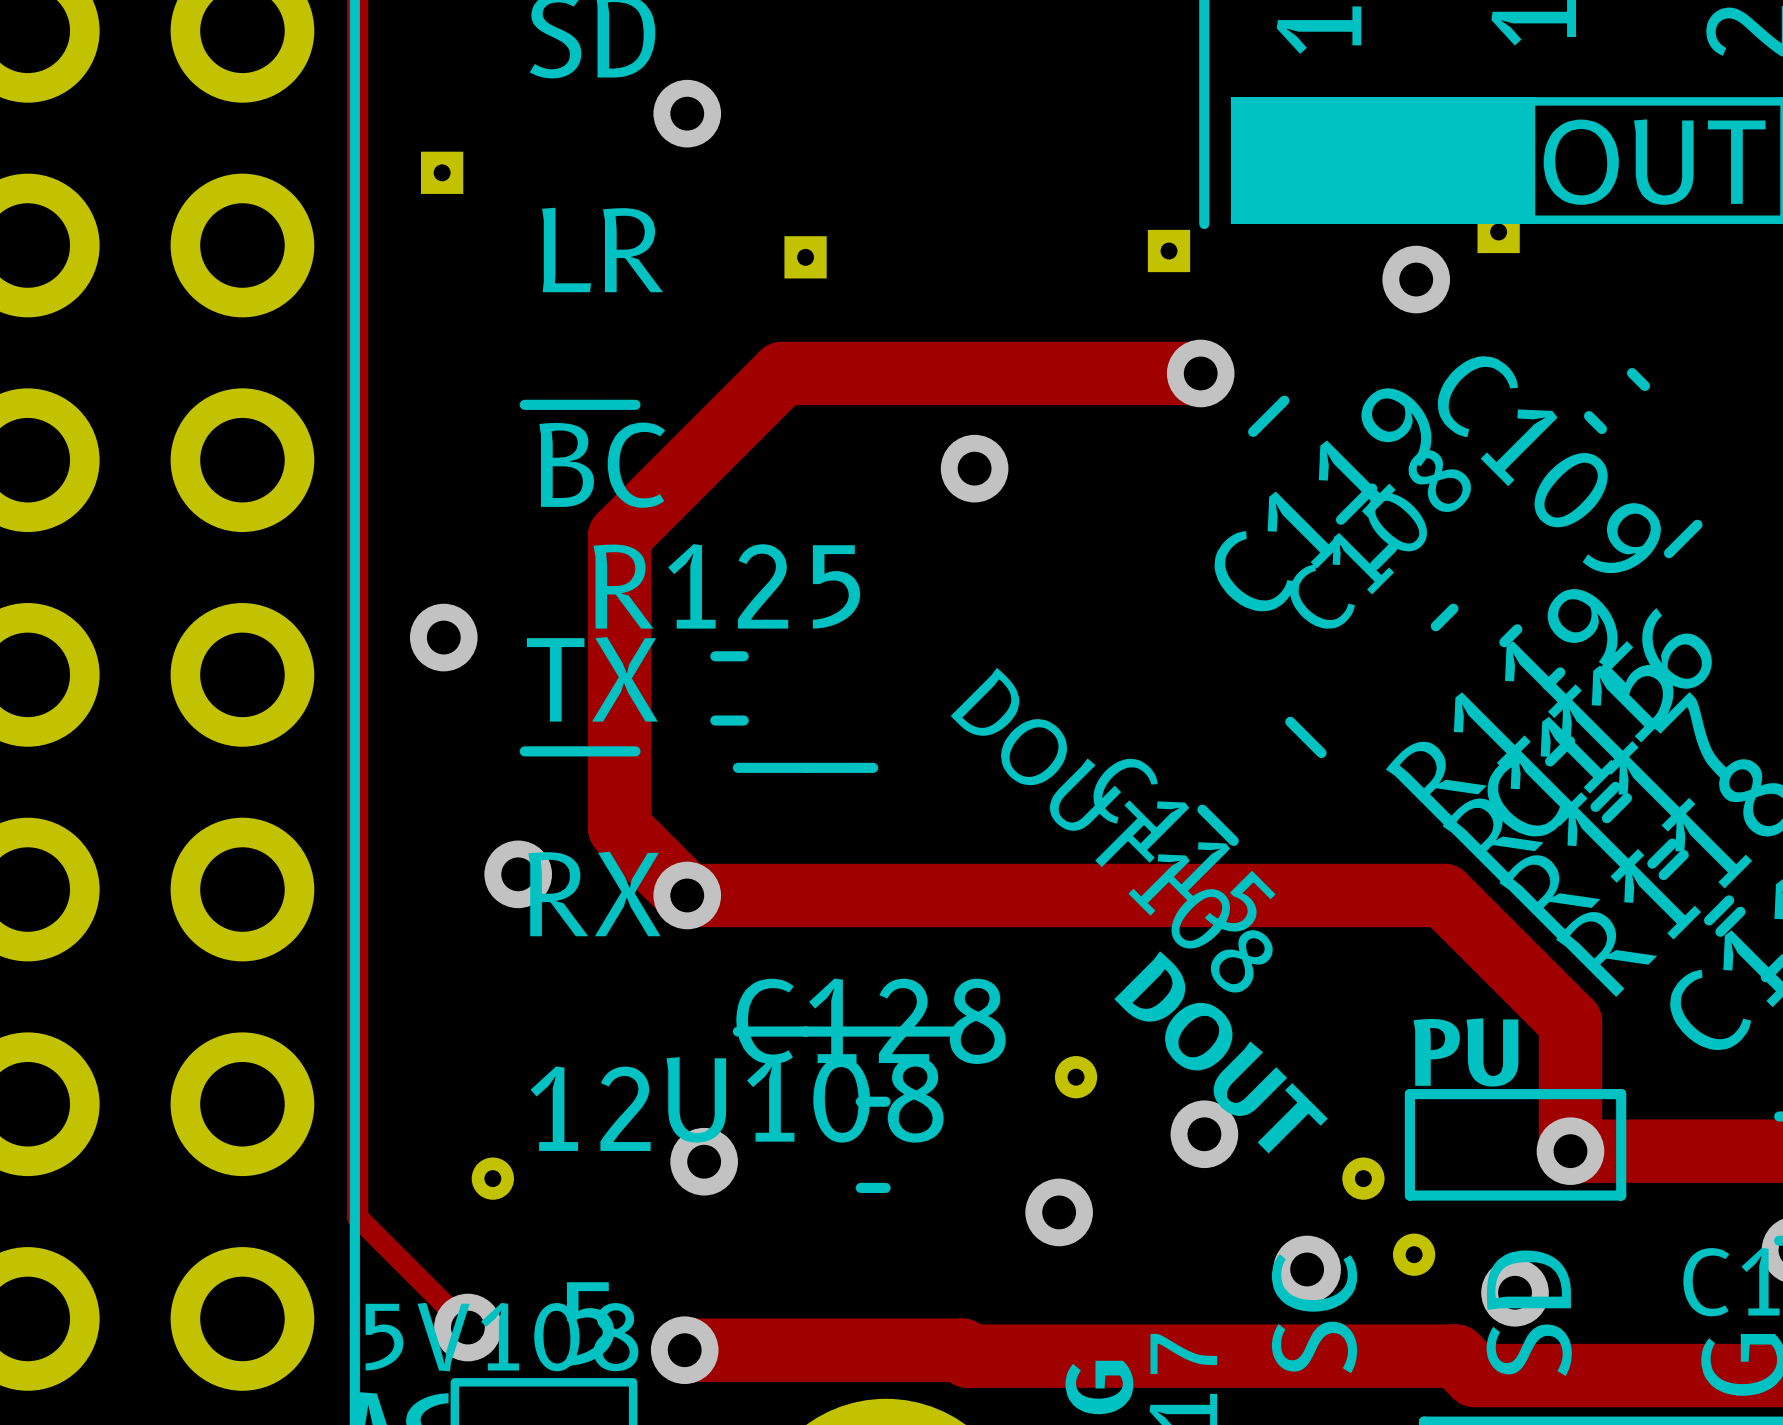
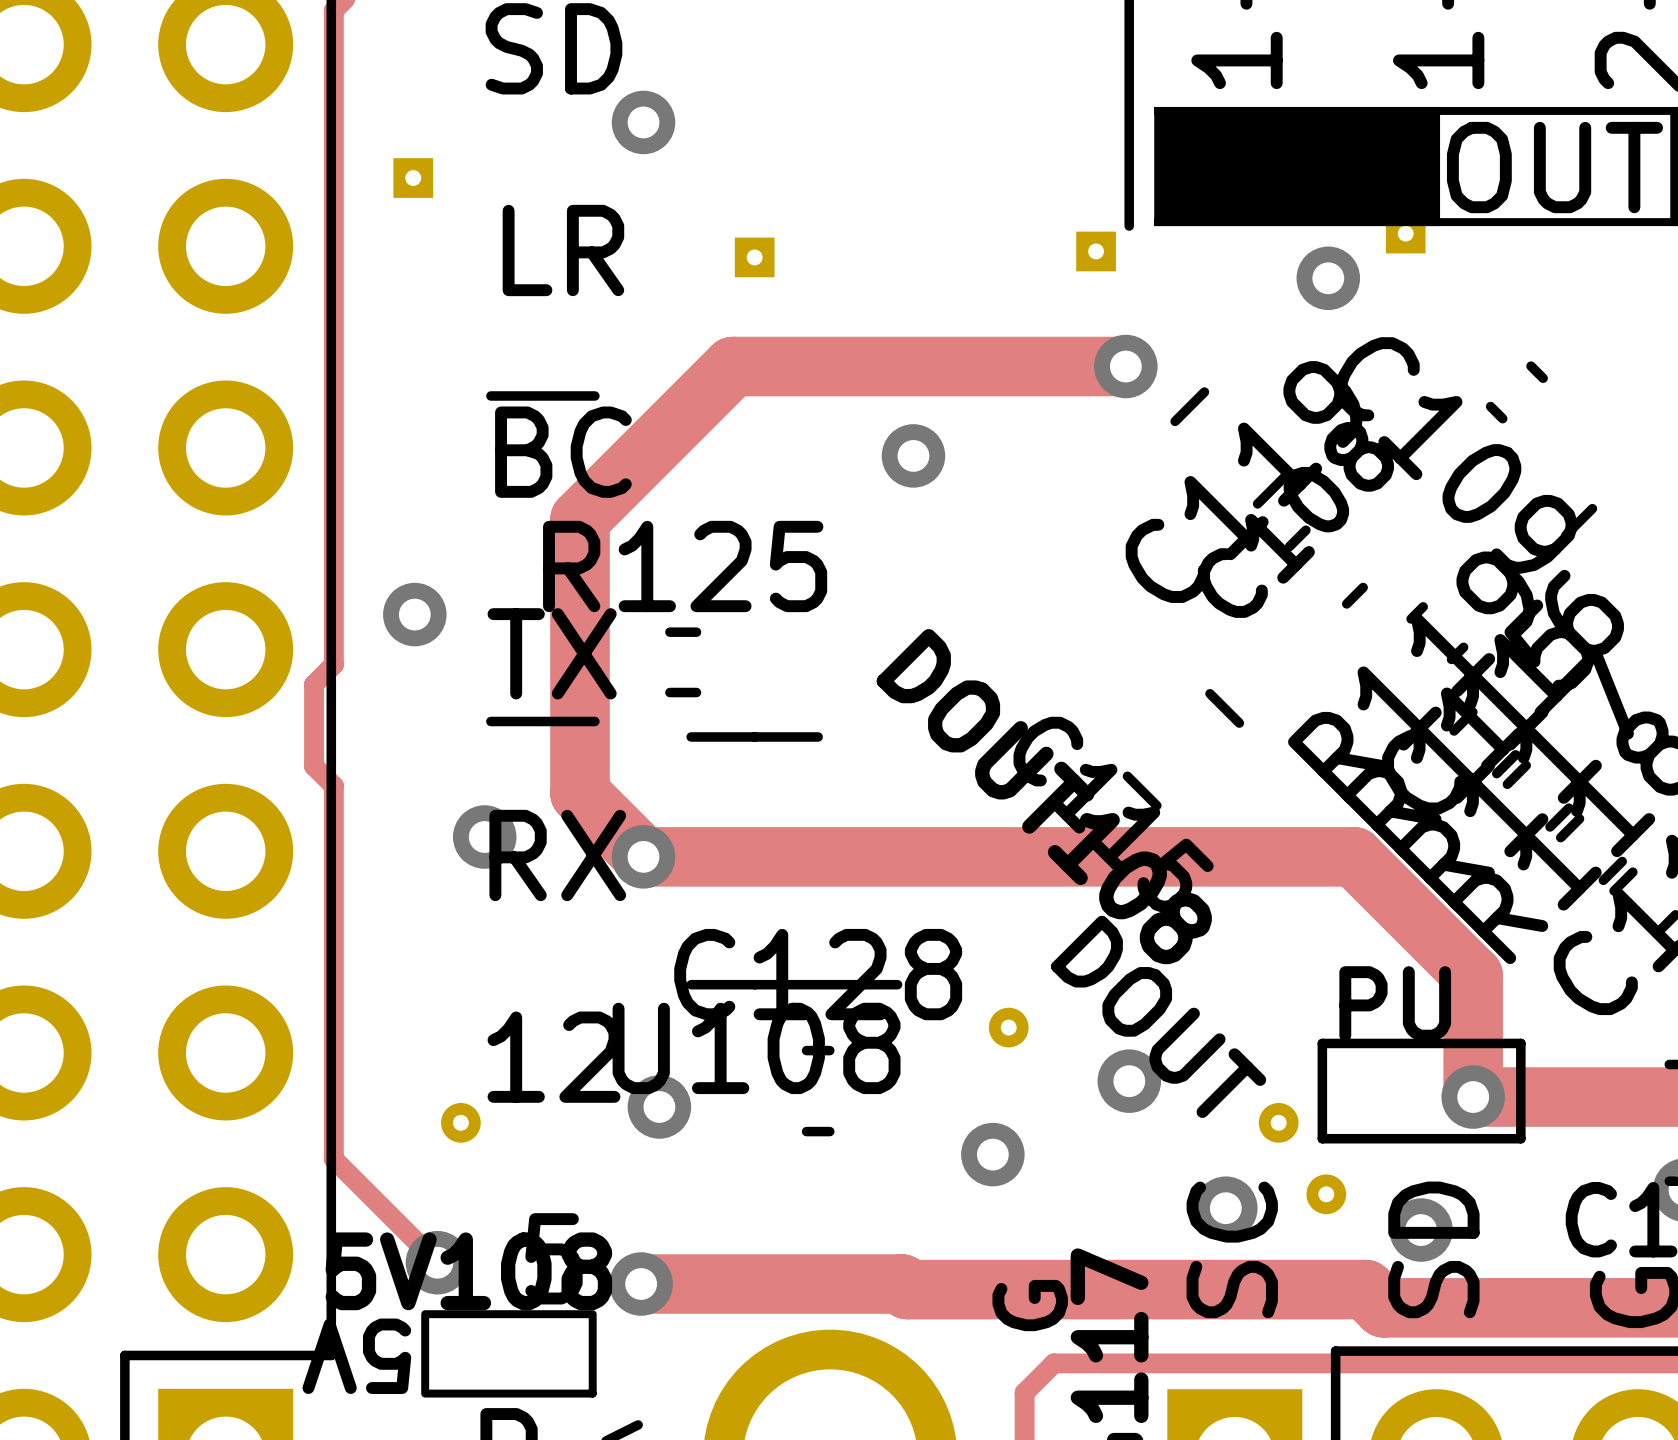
track: (357, 690) (357, 820) -> (333, 664) (314, 684) (314, 766) (333, 786)

